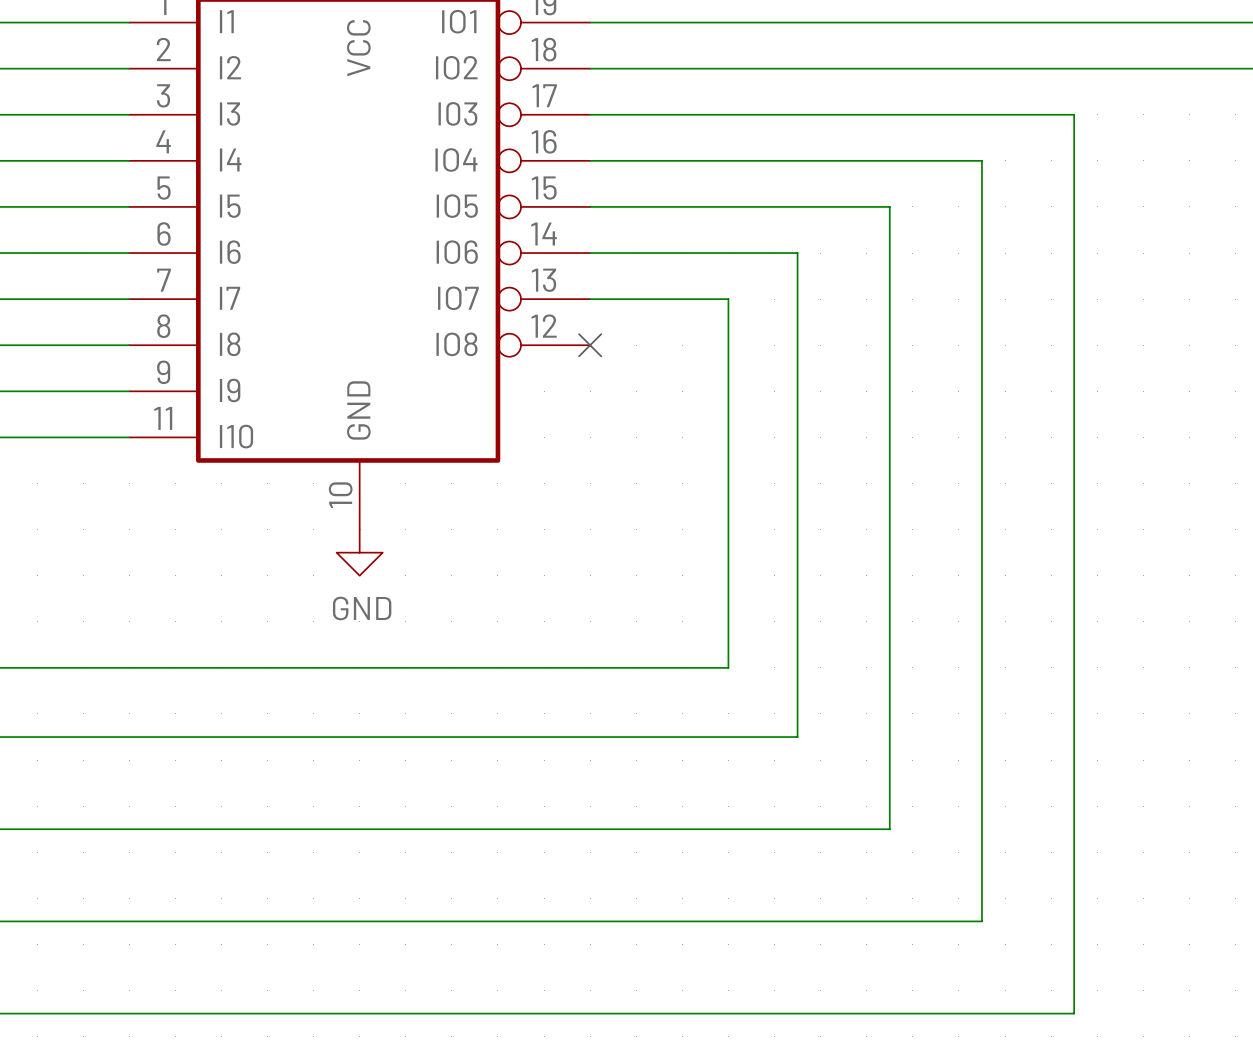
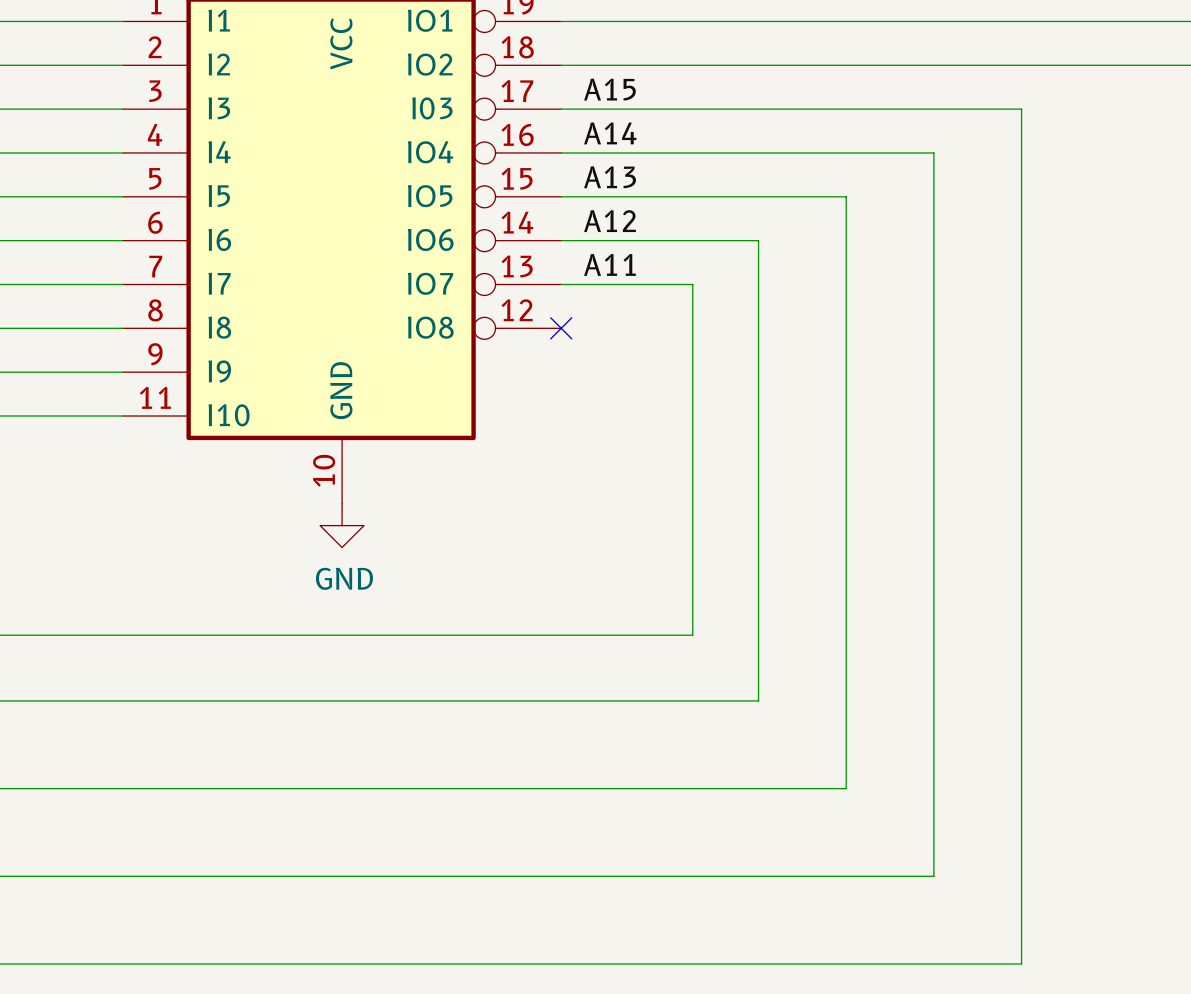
label: none -> A15 (609, 89)
label: none -> A14 (610, 133)
label: none -> A13 (610, 177)
label: none -> A12 (609, 221)
label: none -> A11 (609, 264)

